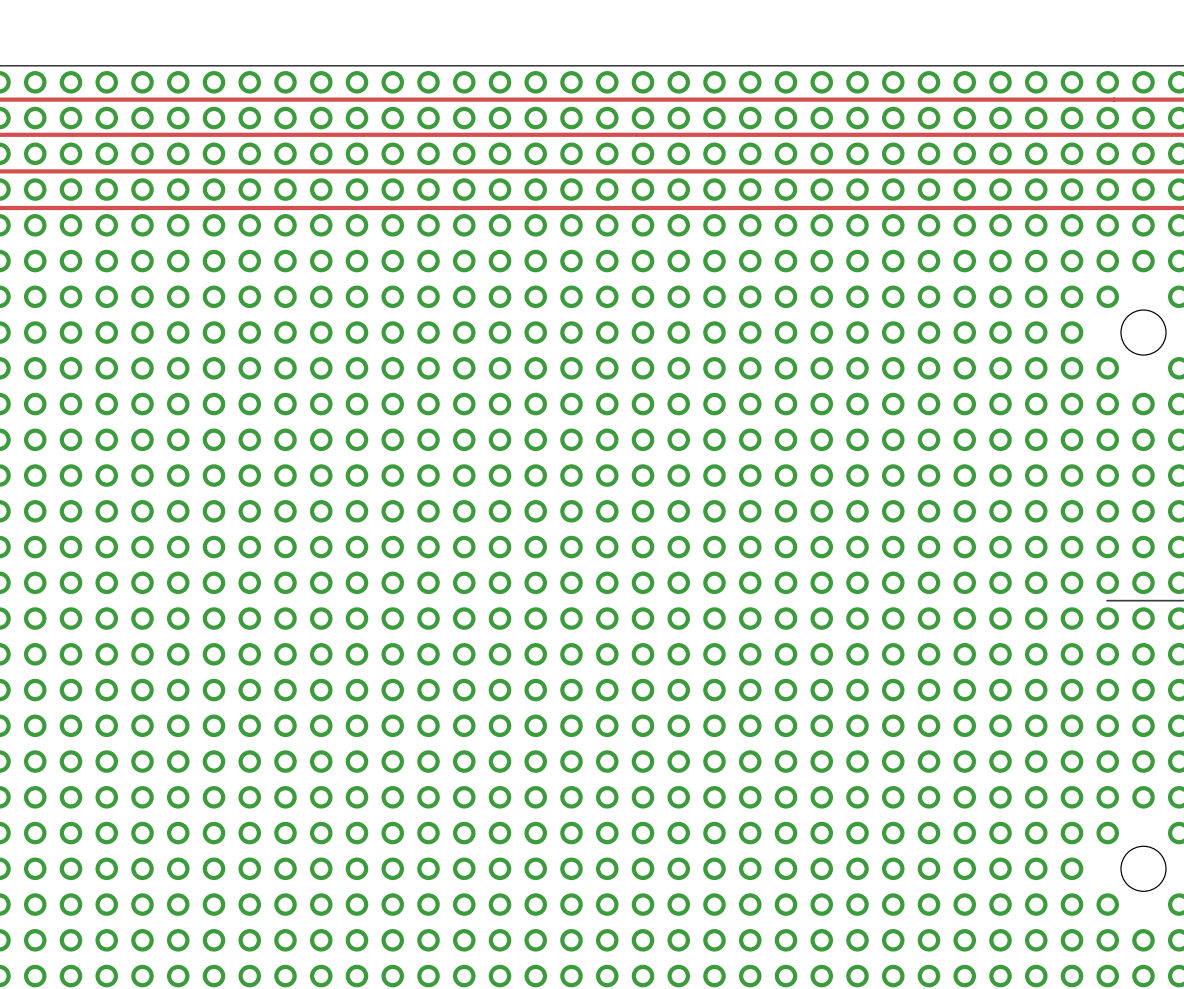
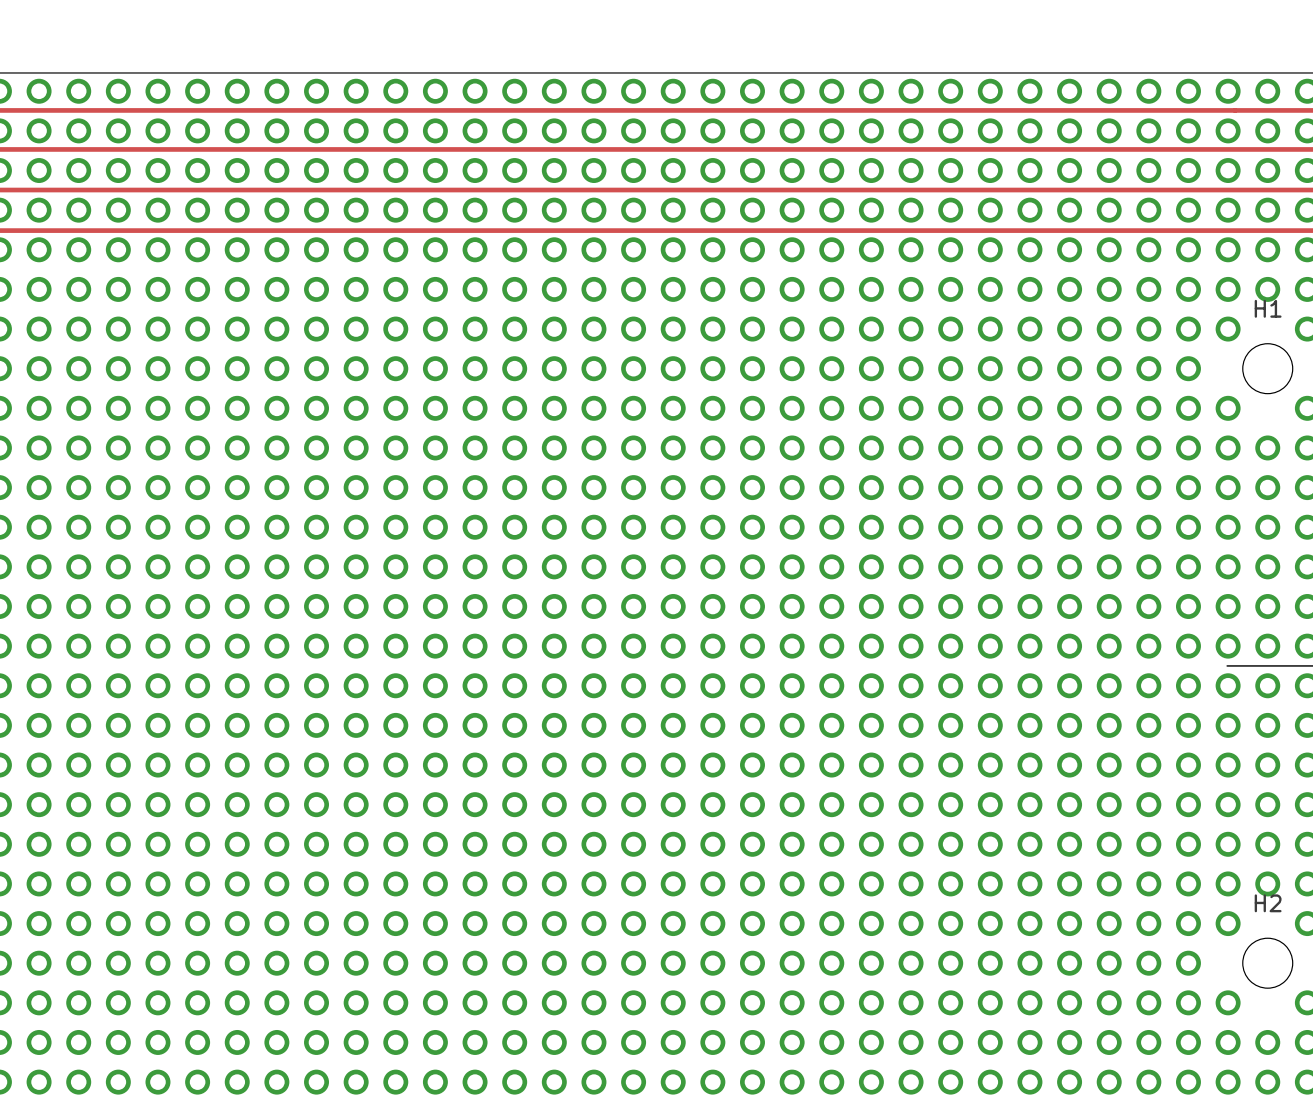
H1 name: none -> H1 (1268, 308)
H2 name: none -> H2 (1268, 903)

